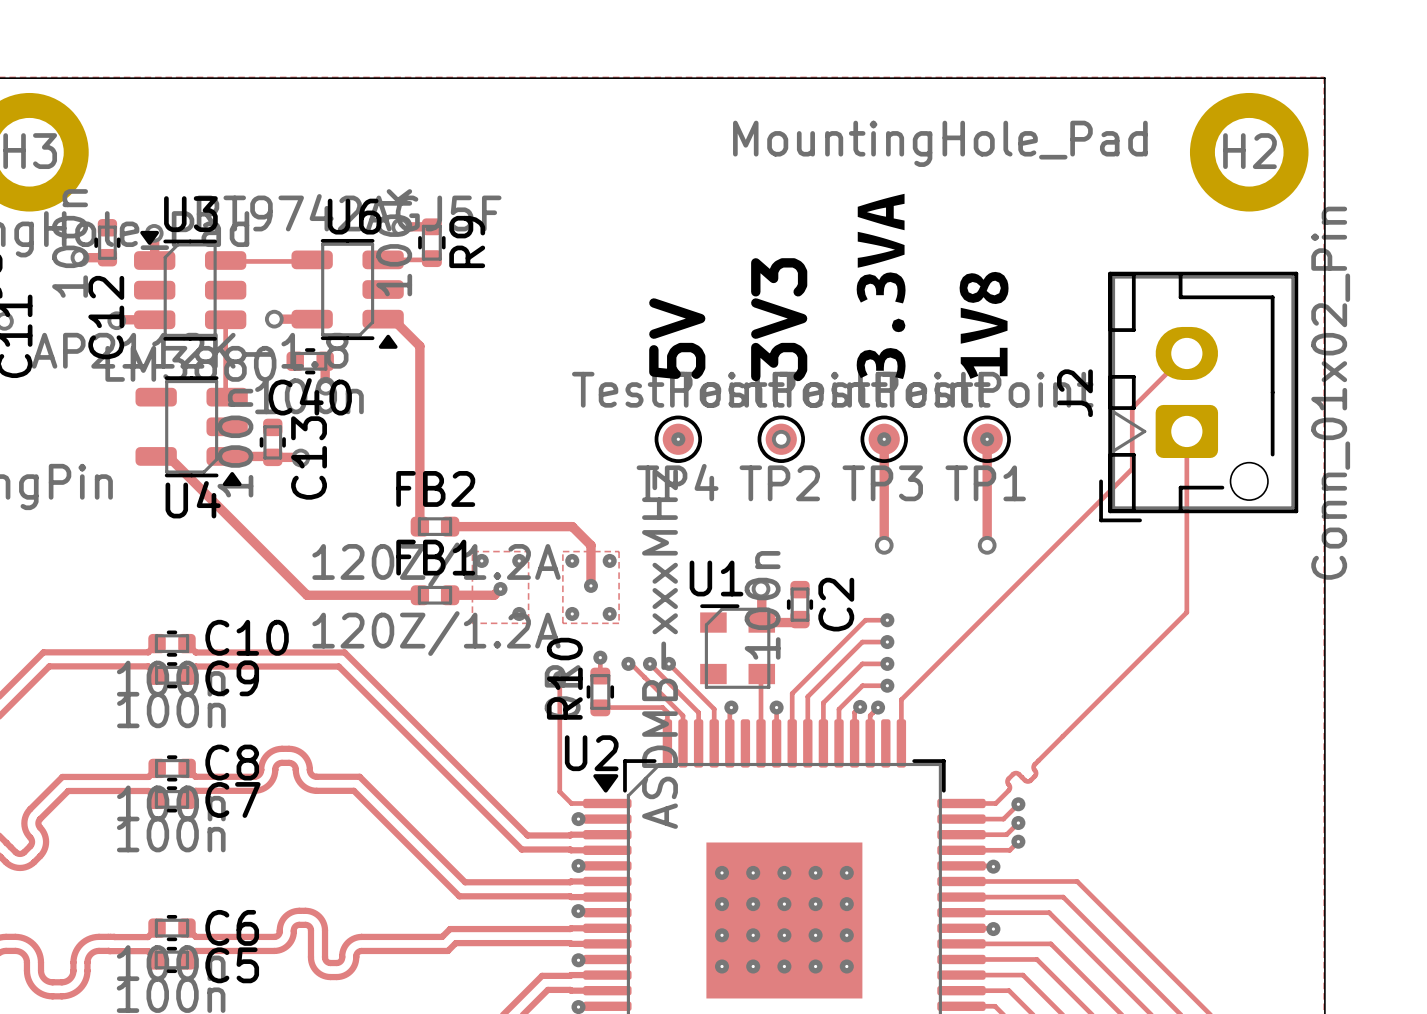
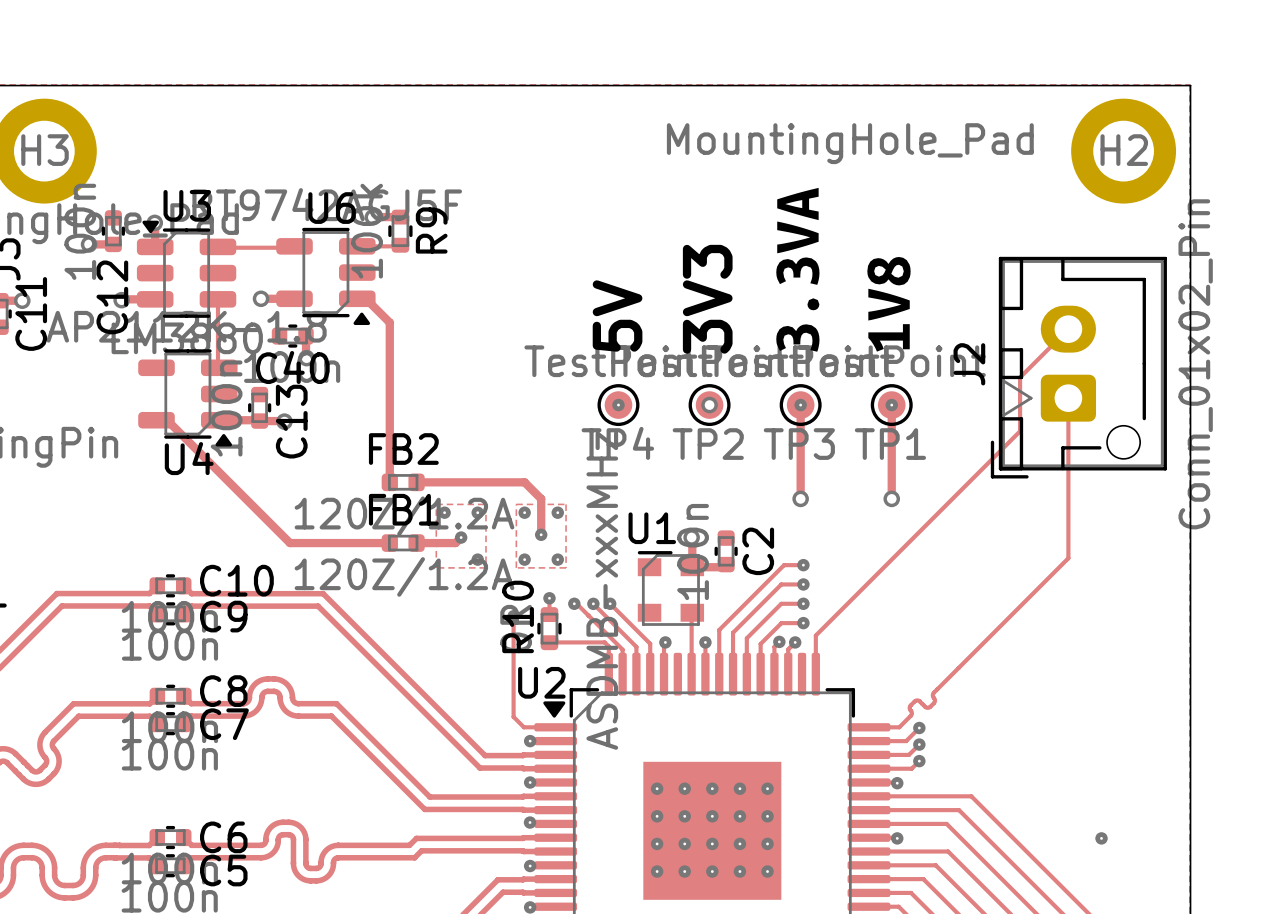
via: none -> (1101, 838)

